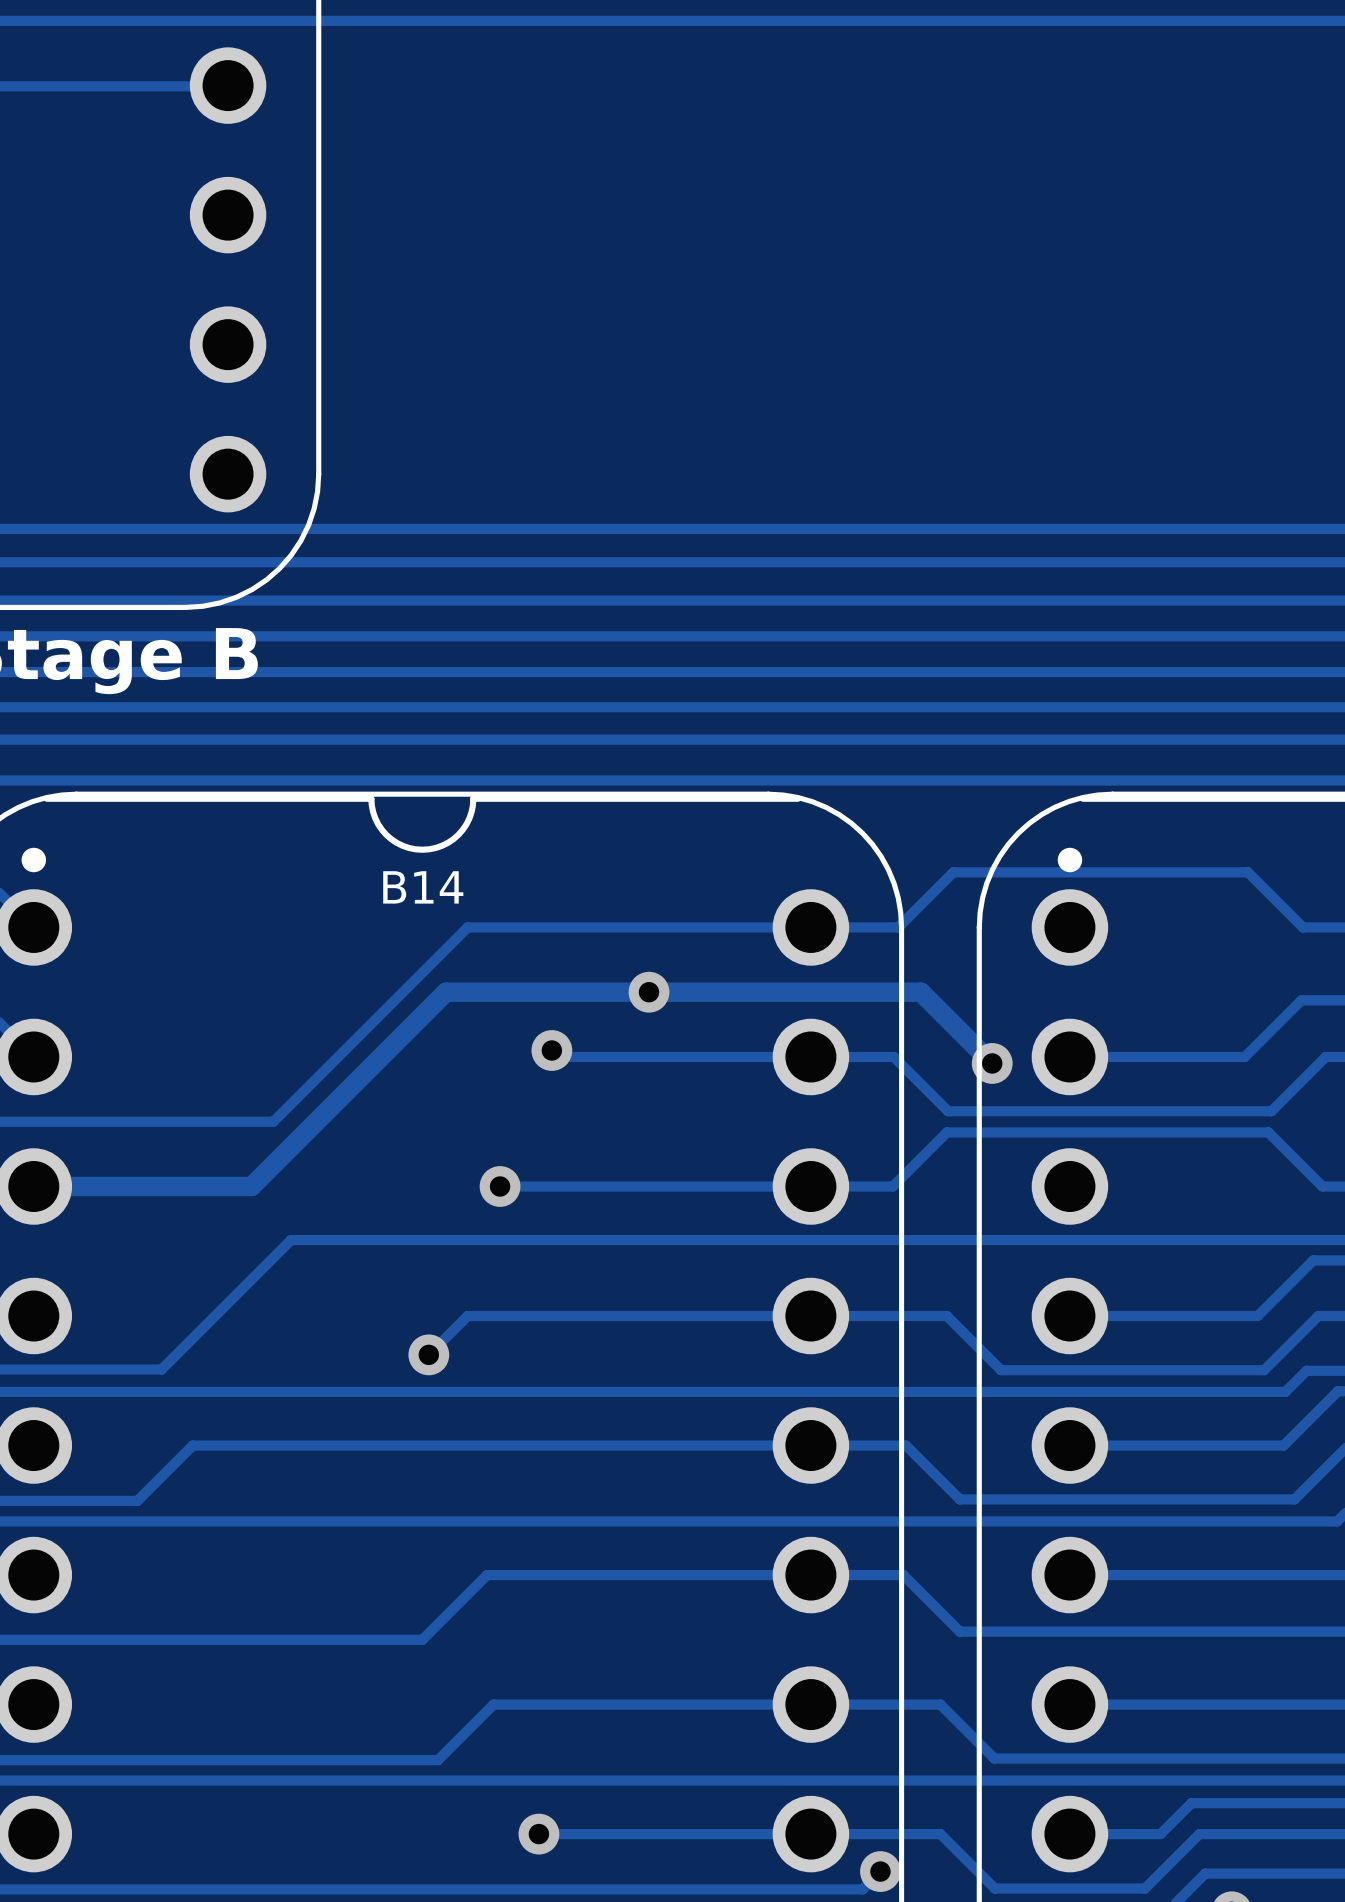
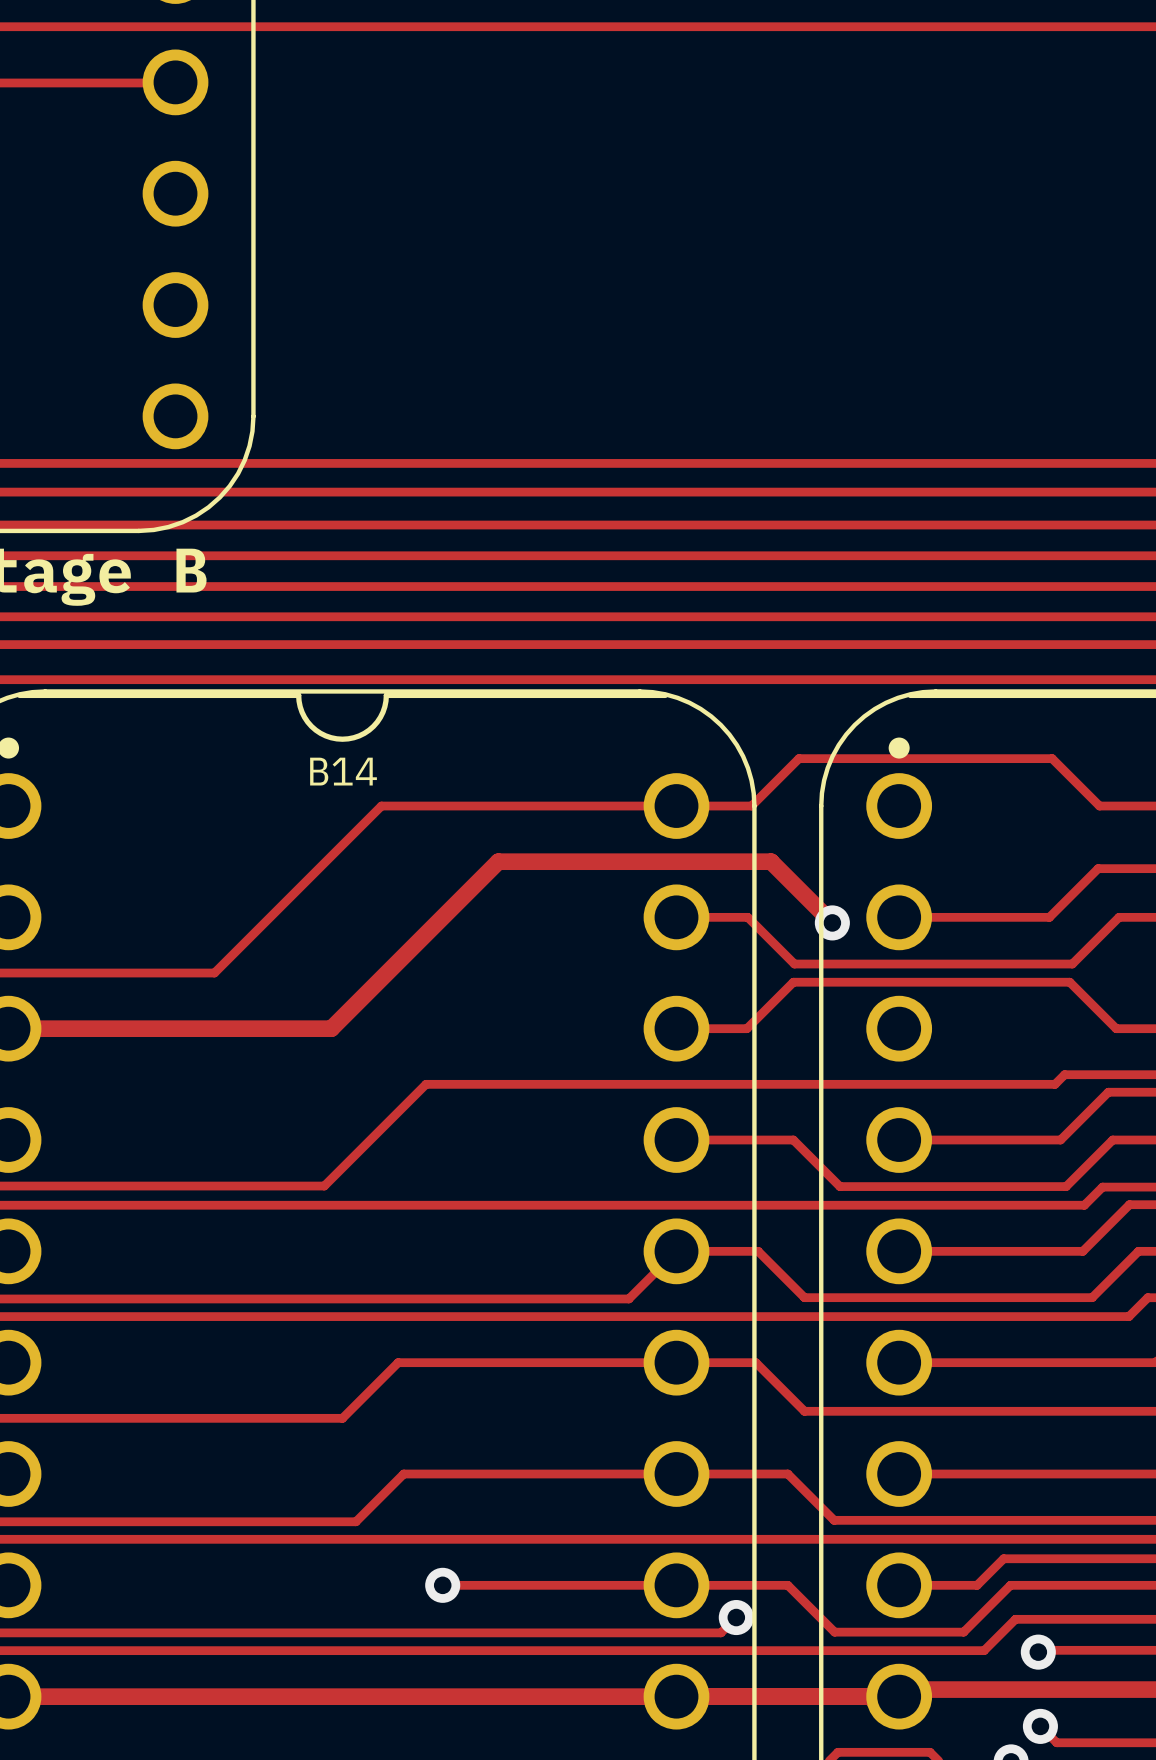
track: (603, 992) (445, 992) (251, 1186) -> (498, 861) (331, 1028) (195, 1028)
via: (649, 992) -> none
track: (551, 1050) (558, 1056) (810, 1056) -> none
via: (551, 1050) -> none
track: (500, 1186) (810, 1186) -> none
via: (500, 1186) -> none
track: (1262, 1240) (291, 1240) (161, 1369) -> (1064, 1074) (1055, 1084) (426, 1084) (324, 1186) (118, 1186)
track: (810, 1316) (467, 1316) (428, 1354) -> none
via: (428, 1354) -> none
track: (810, 1445) (192, 1445) (137, 1500) -> (676, 1251) (628, 1298) (97, 1298)

